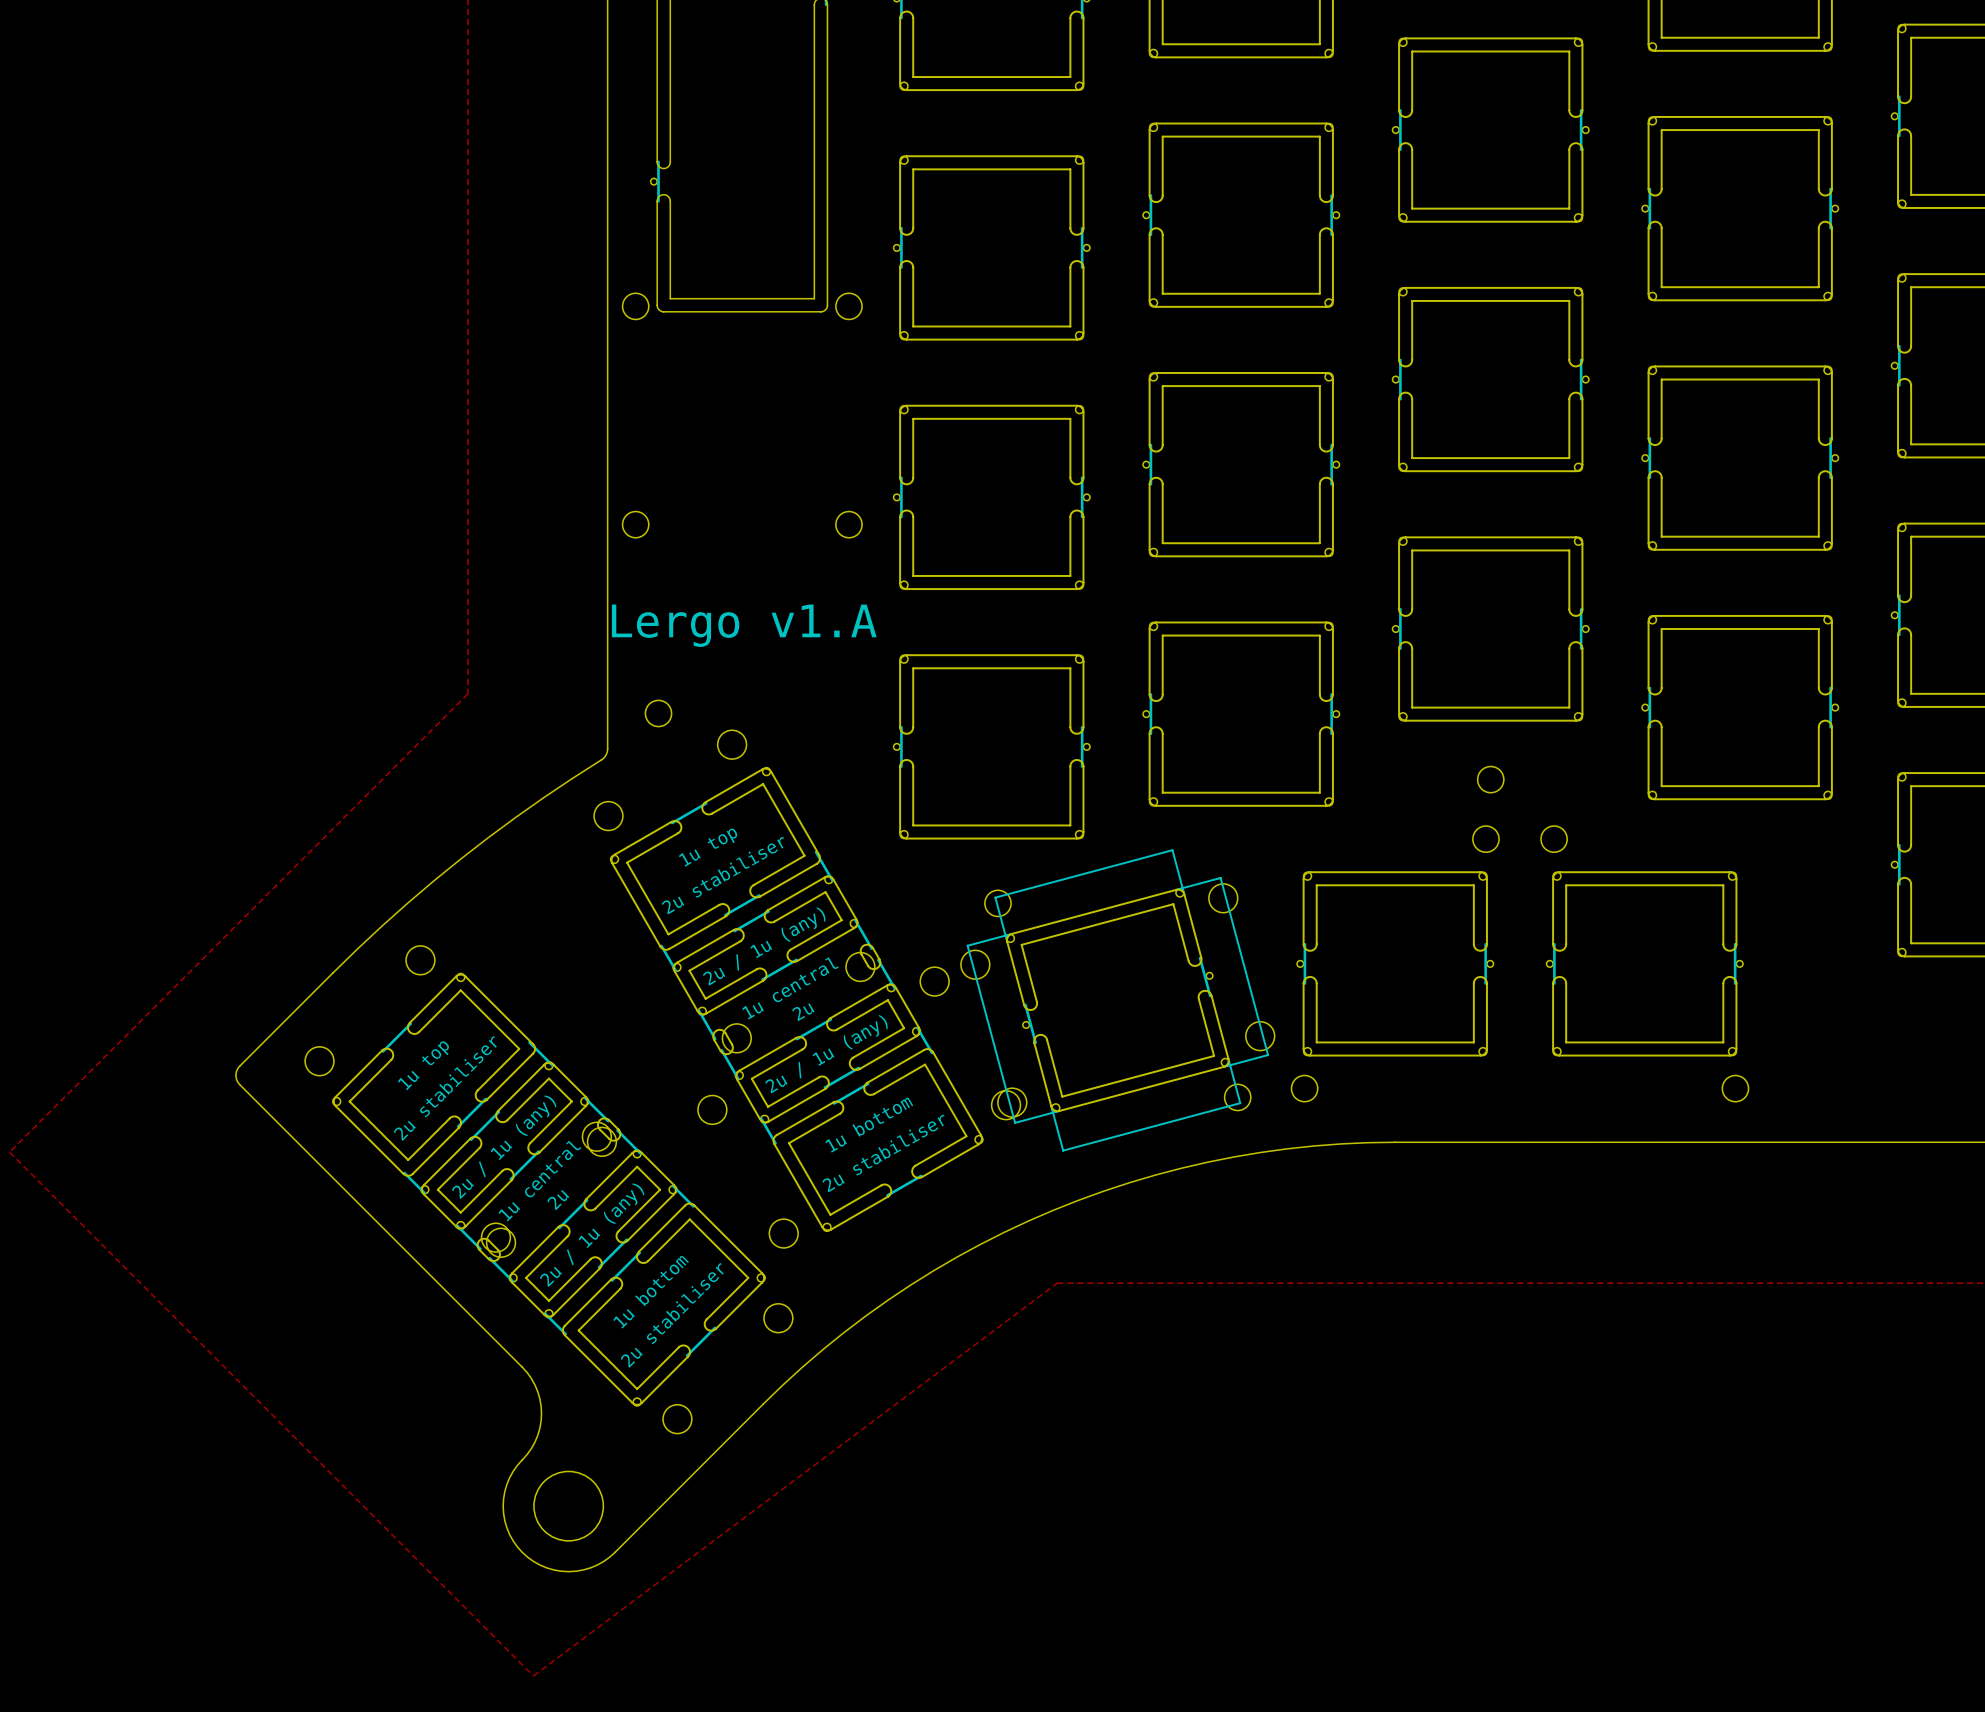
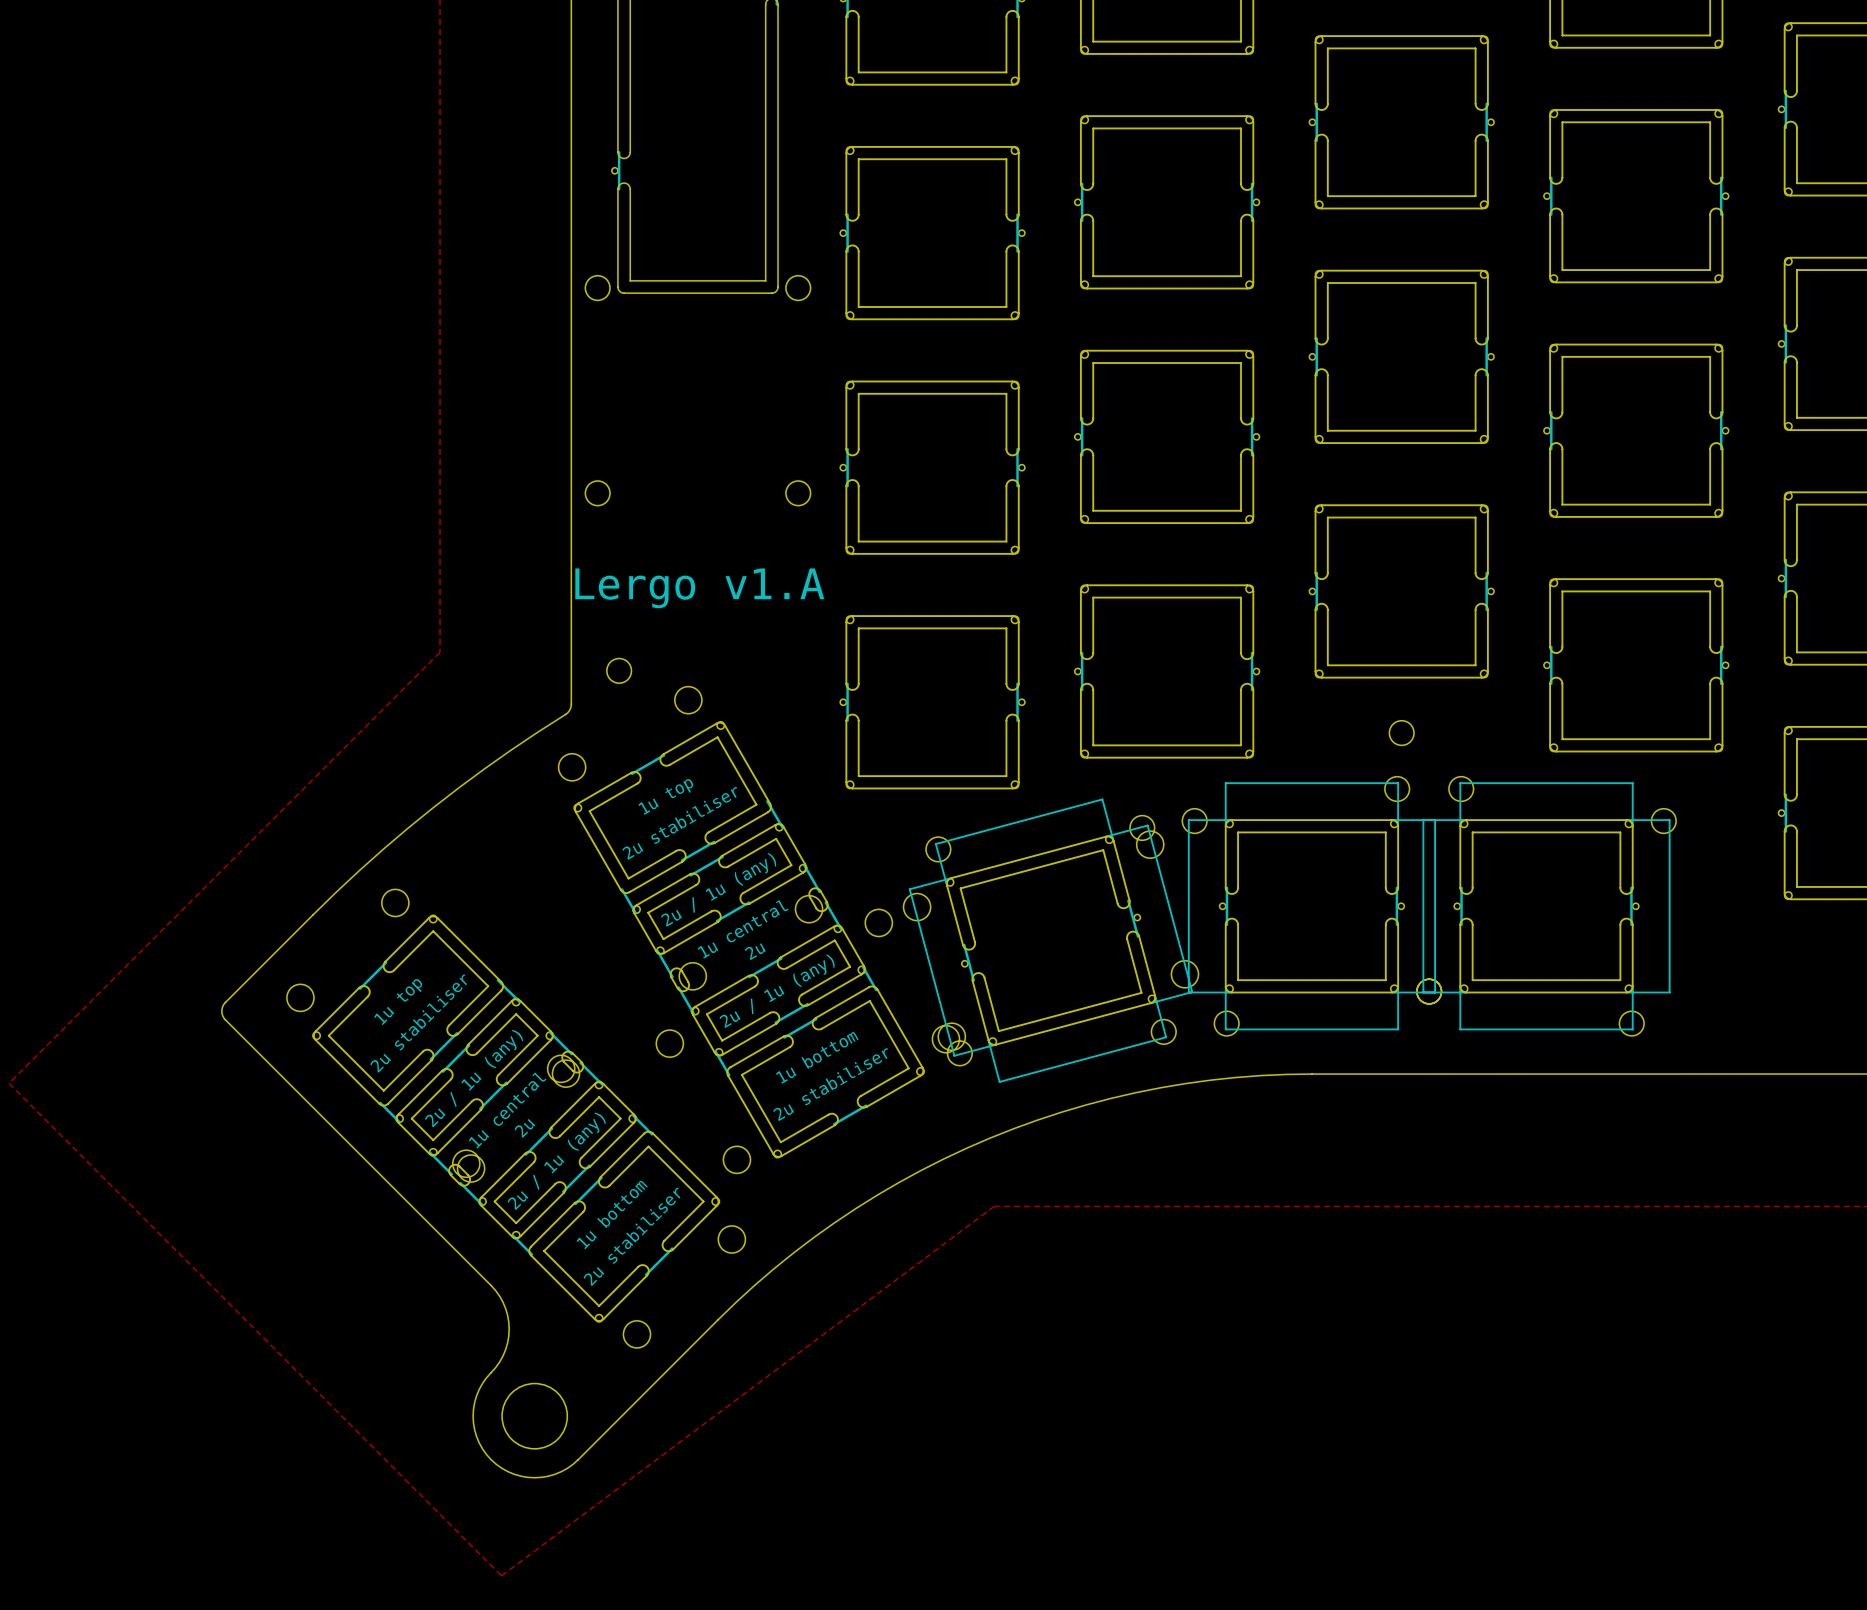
part footprint: [1291, 826, 1500, 1102] -> [1182, 776, 1442, 1036]
part footprint: [1540, 826, 1749, 1102] -> [1416, 776, 1677, 1036]
drawing: none -> [908, 782, 1671, 1083]
part footprint: [984, 888, 1251, 1113] -> [926, 815, 1177, 1066]
line: (1176, 889) (1220, 877) (1268, 1055) (1223, 1066) -> none
line: (1011, 933) (967, 945) (1015, 1122) (1059, 1110) -> none

